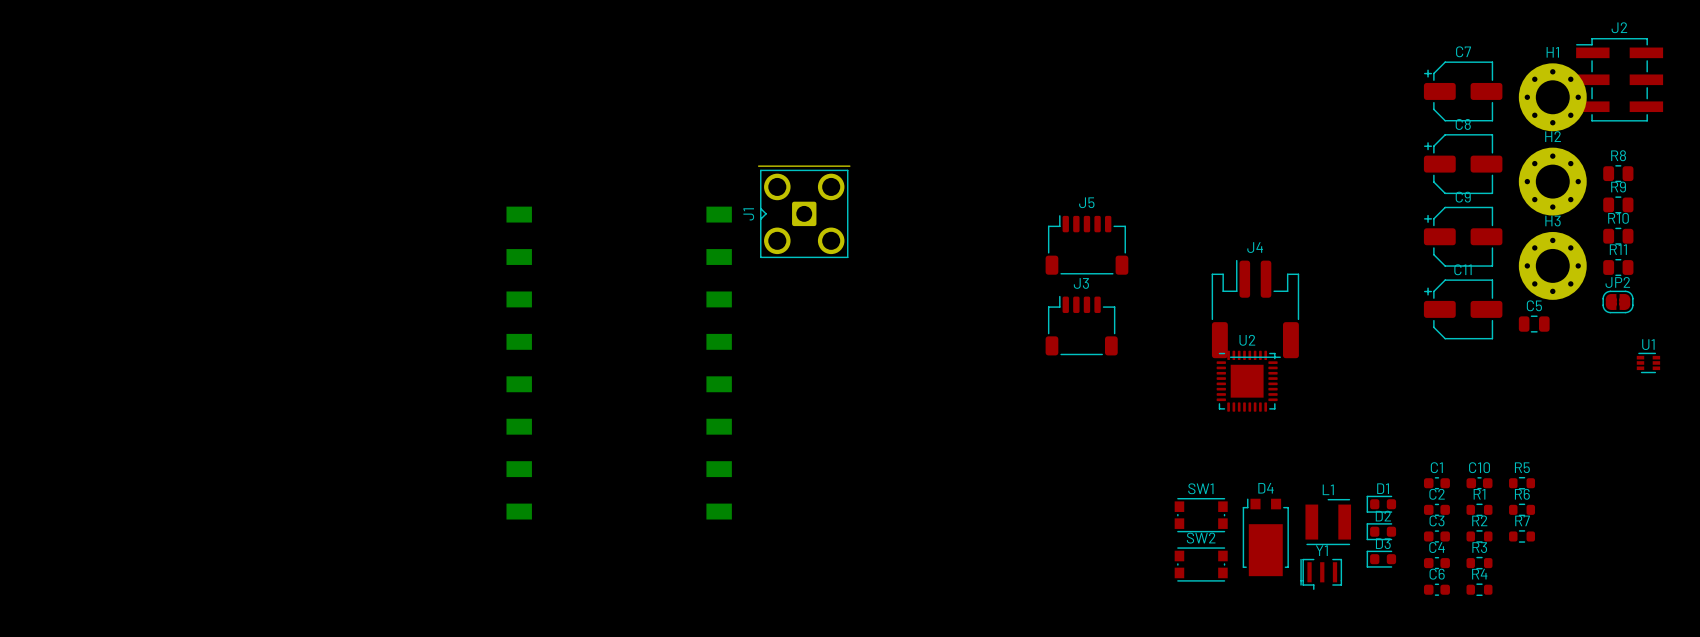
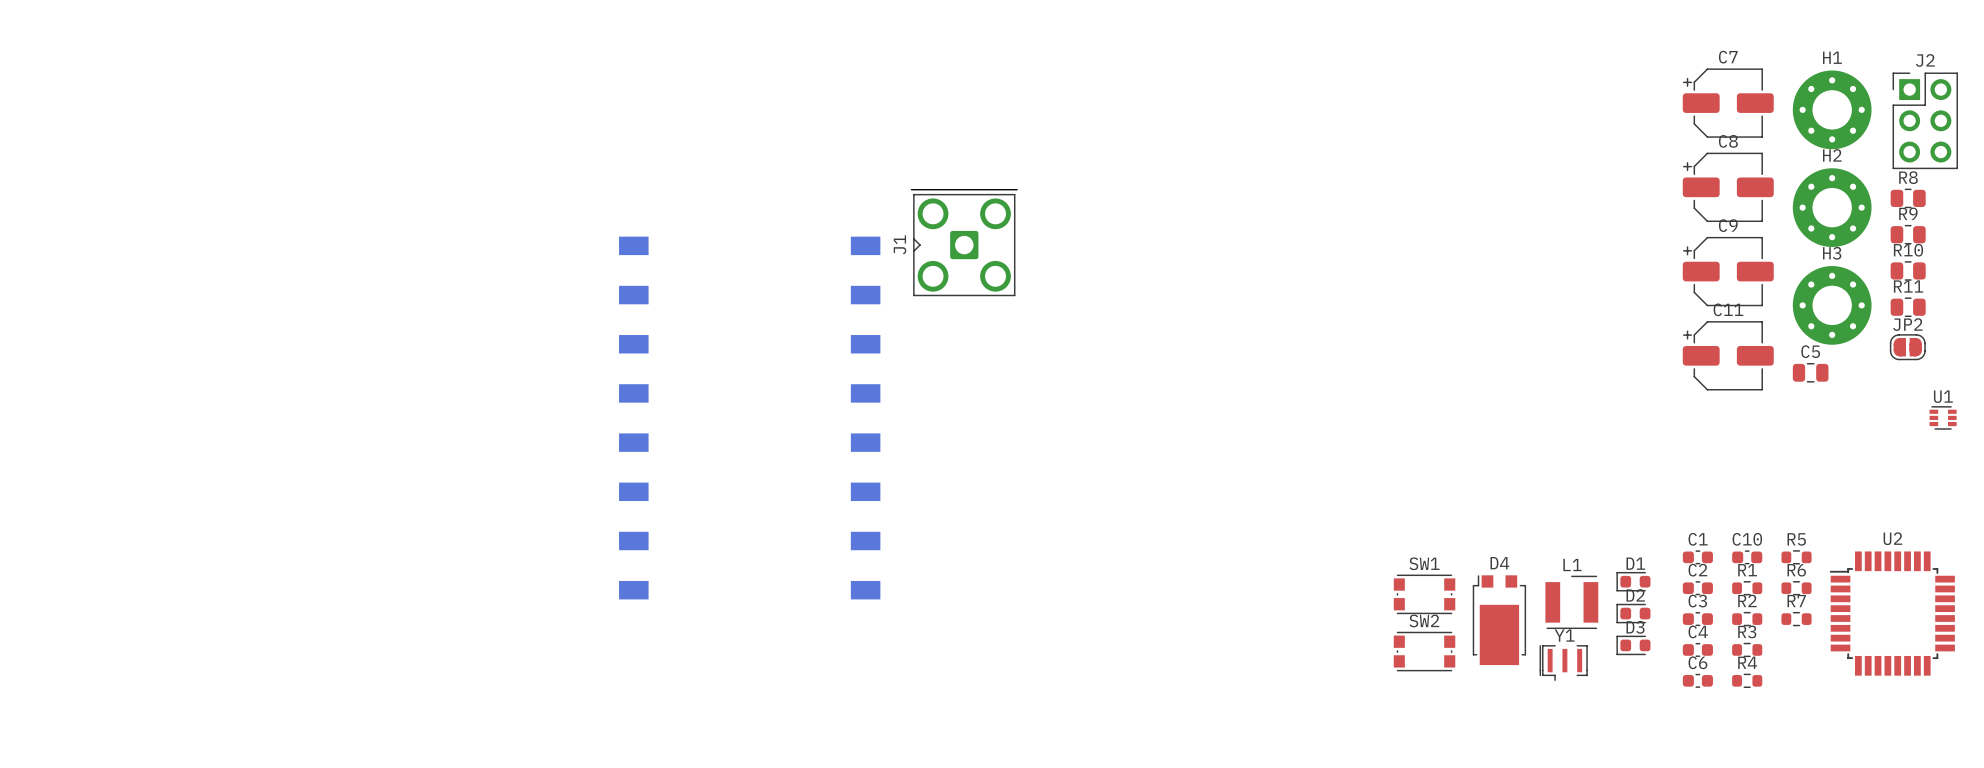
J2 footprint: [1576, 38, 1664, 122] -> [1892, 72, 1958, 170]
J5: (1086, 244) -> none
J4: (1255, 309) -> none
J3: (1081, 325) -> none
U2 name position: U2 (1247, 340) -> U2 (1892, 538)
U2 footprint: [1216, 350, 1278, 412] -> [1829, 551, 1955, 676]

